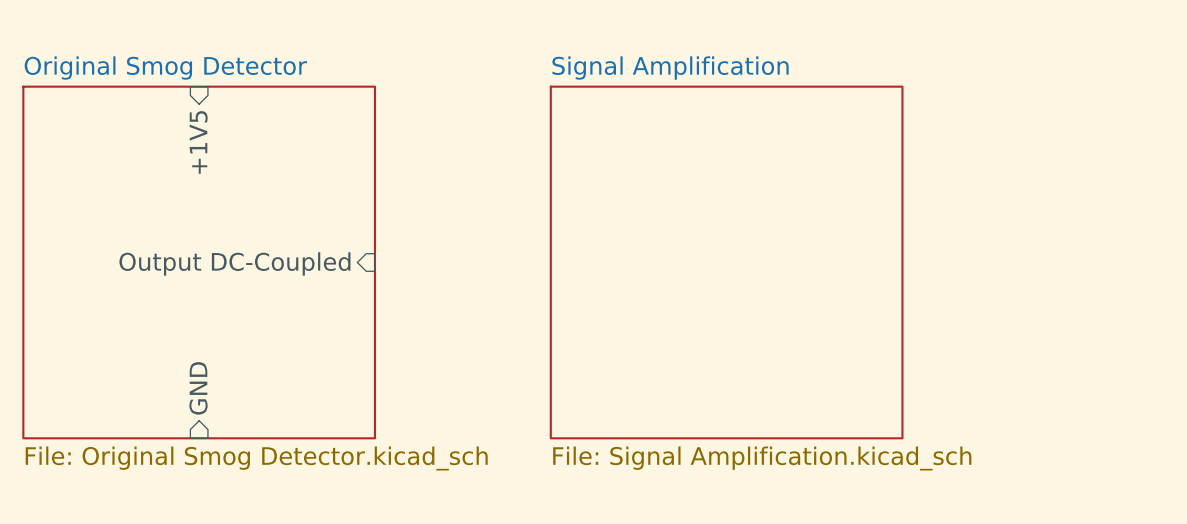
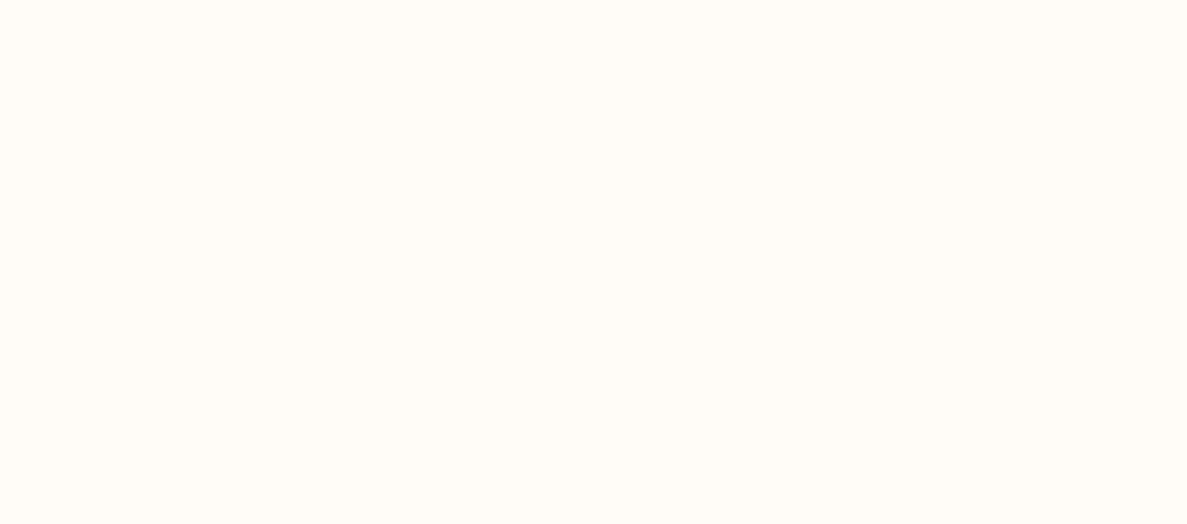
sheet pin: +1V5 (198, 142) -> none
sheet Original Smog Detector: File: Original Smog Detector.kicad_sch (199, 262) -> none
sheet Signal Amplification: File: Signal Amplification.kicad_sch (726, 262) -> none
sheet pin: Output DC-Coupled (234, 263) -> none
sheet pin: GND (198, 388) -> none

